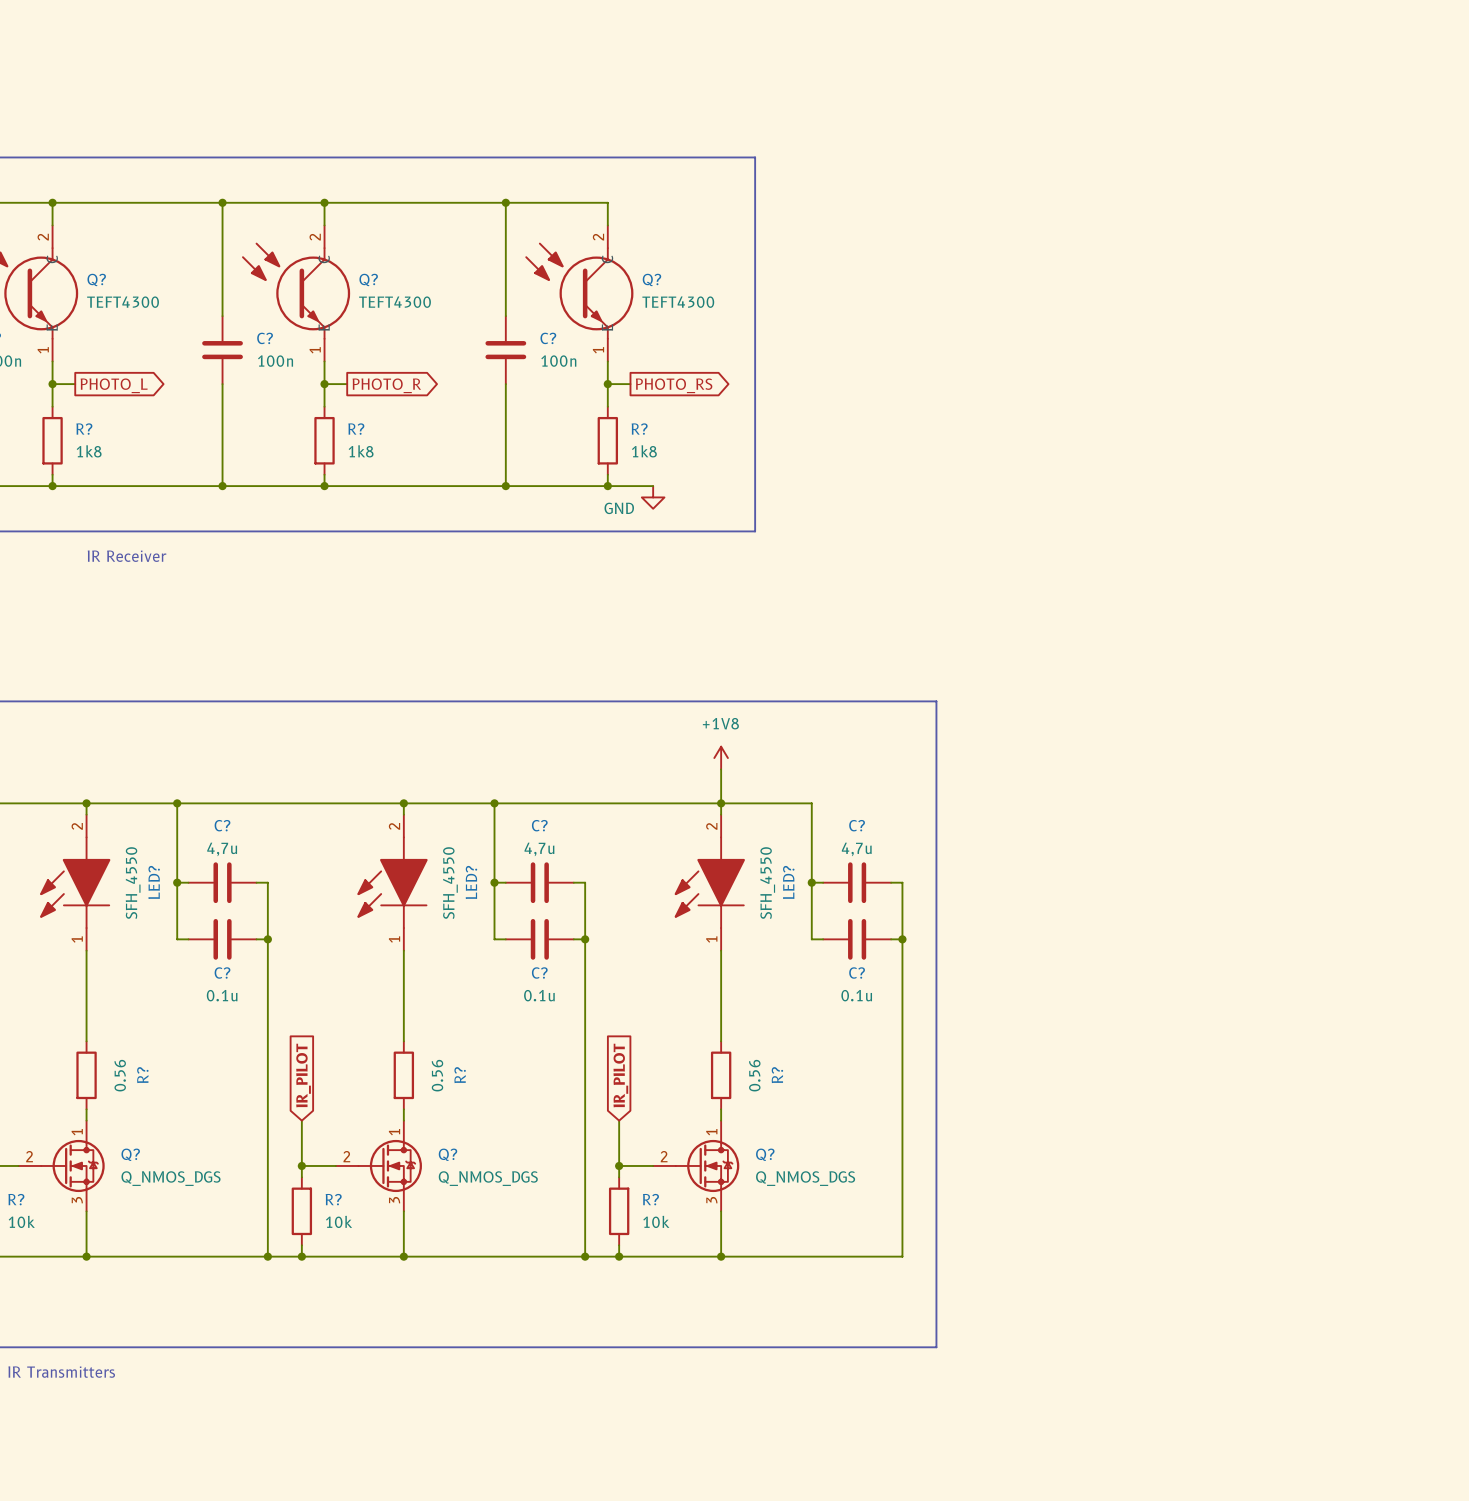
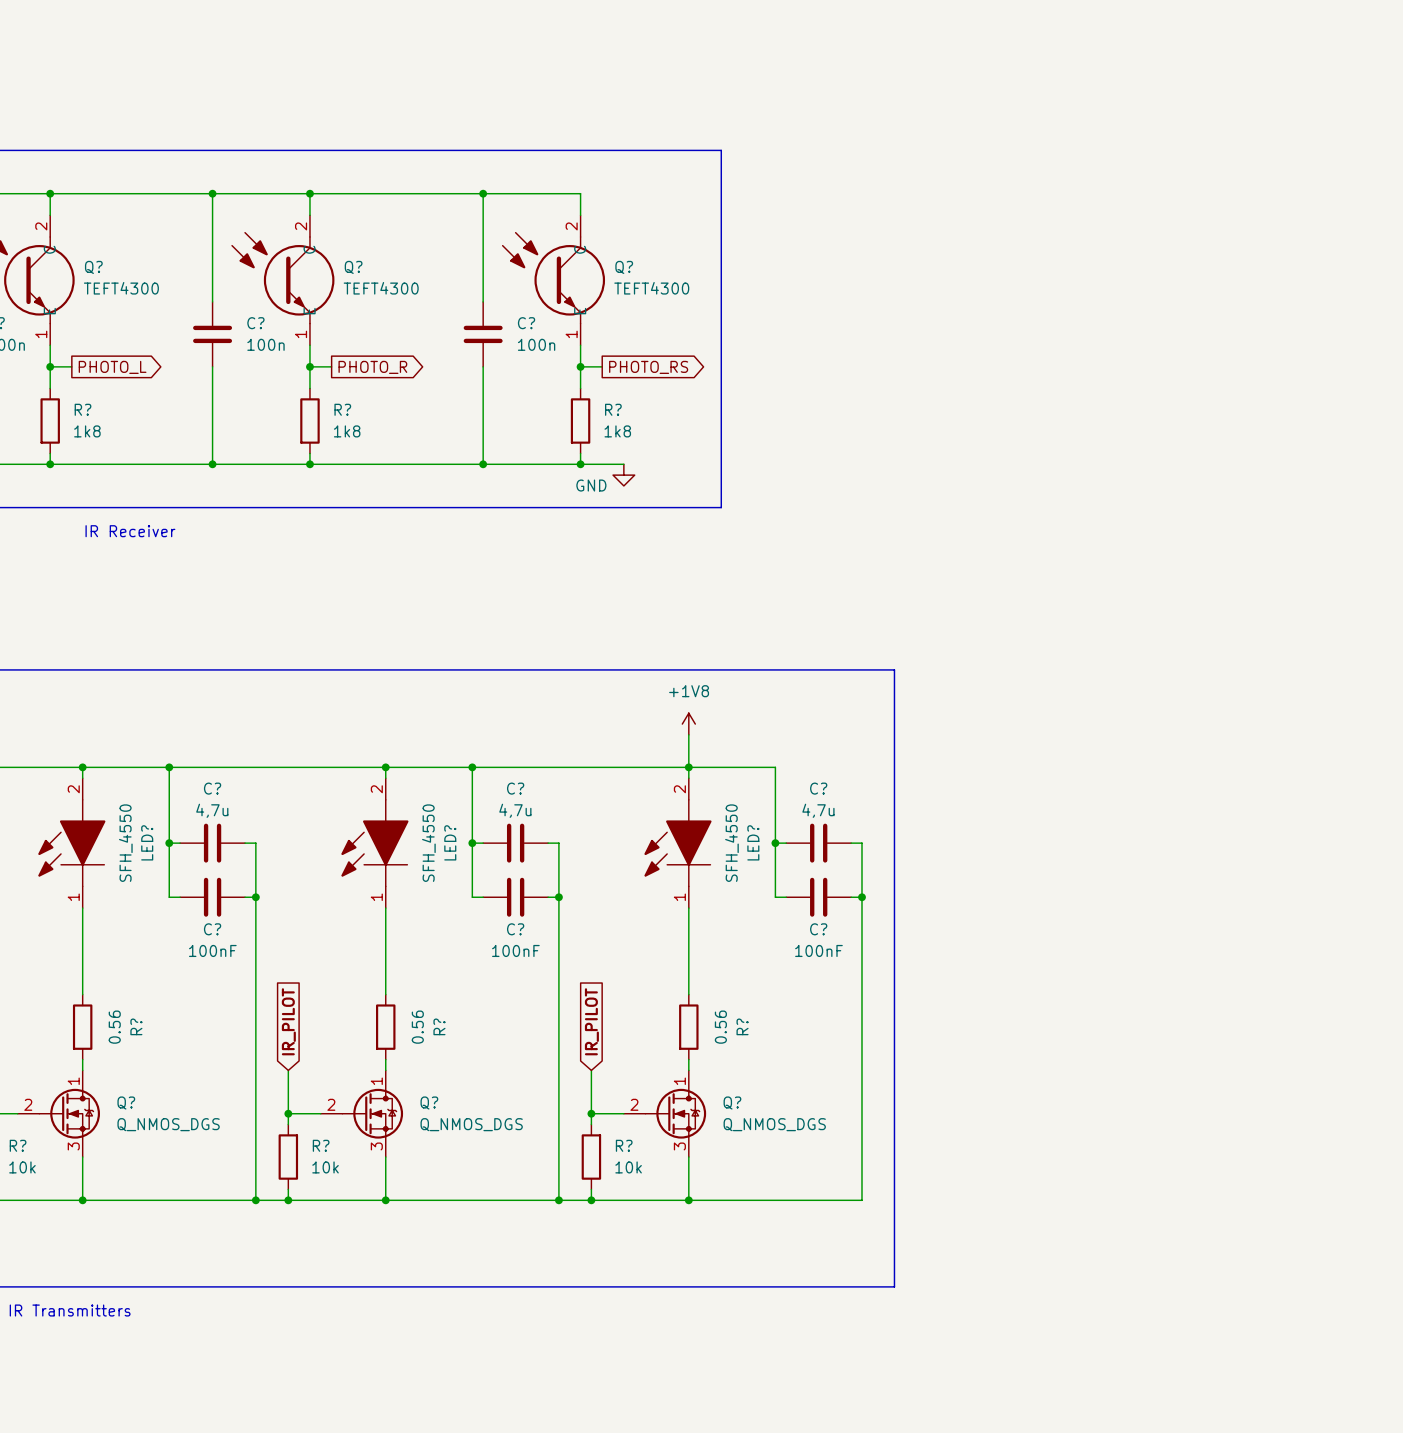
C? value: 0.1u (222, 995) -> 100nF (212, 950)
C? value: 0.1u (539, 995) -> 100nF (515, 950)
C? value: 0.1u (856, 995) -> 100nF (818, 950)

